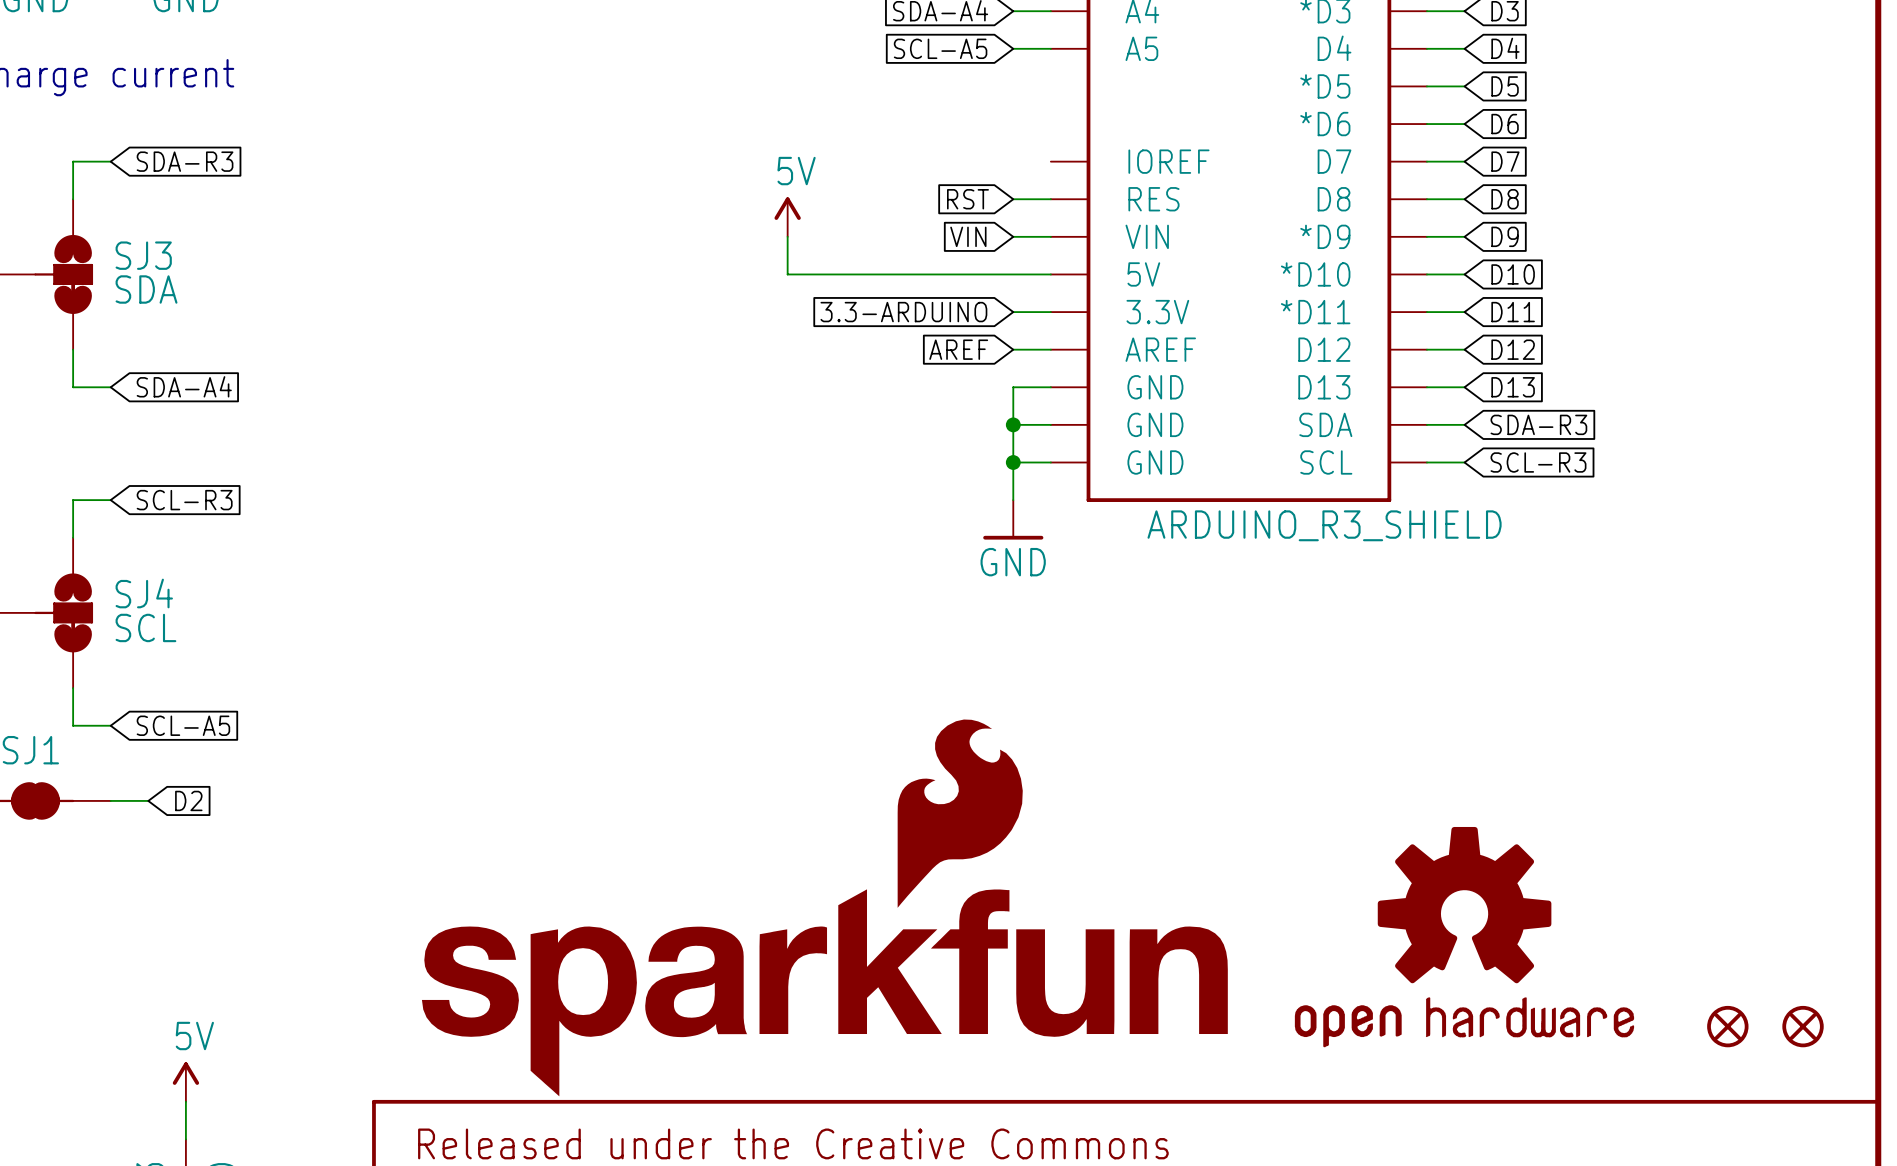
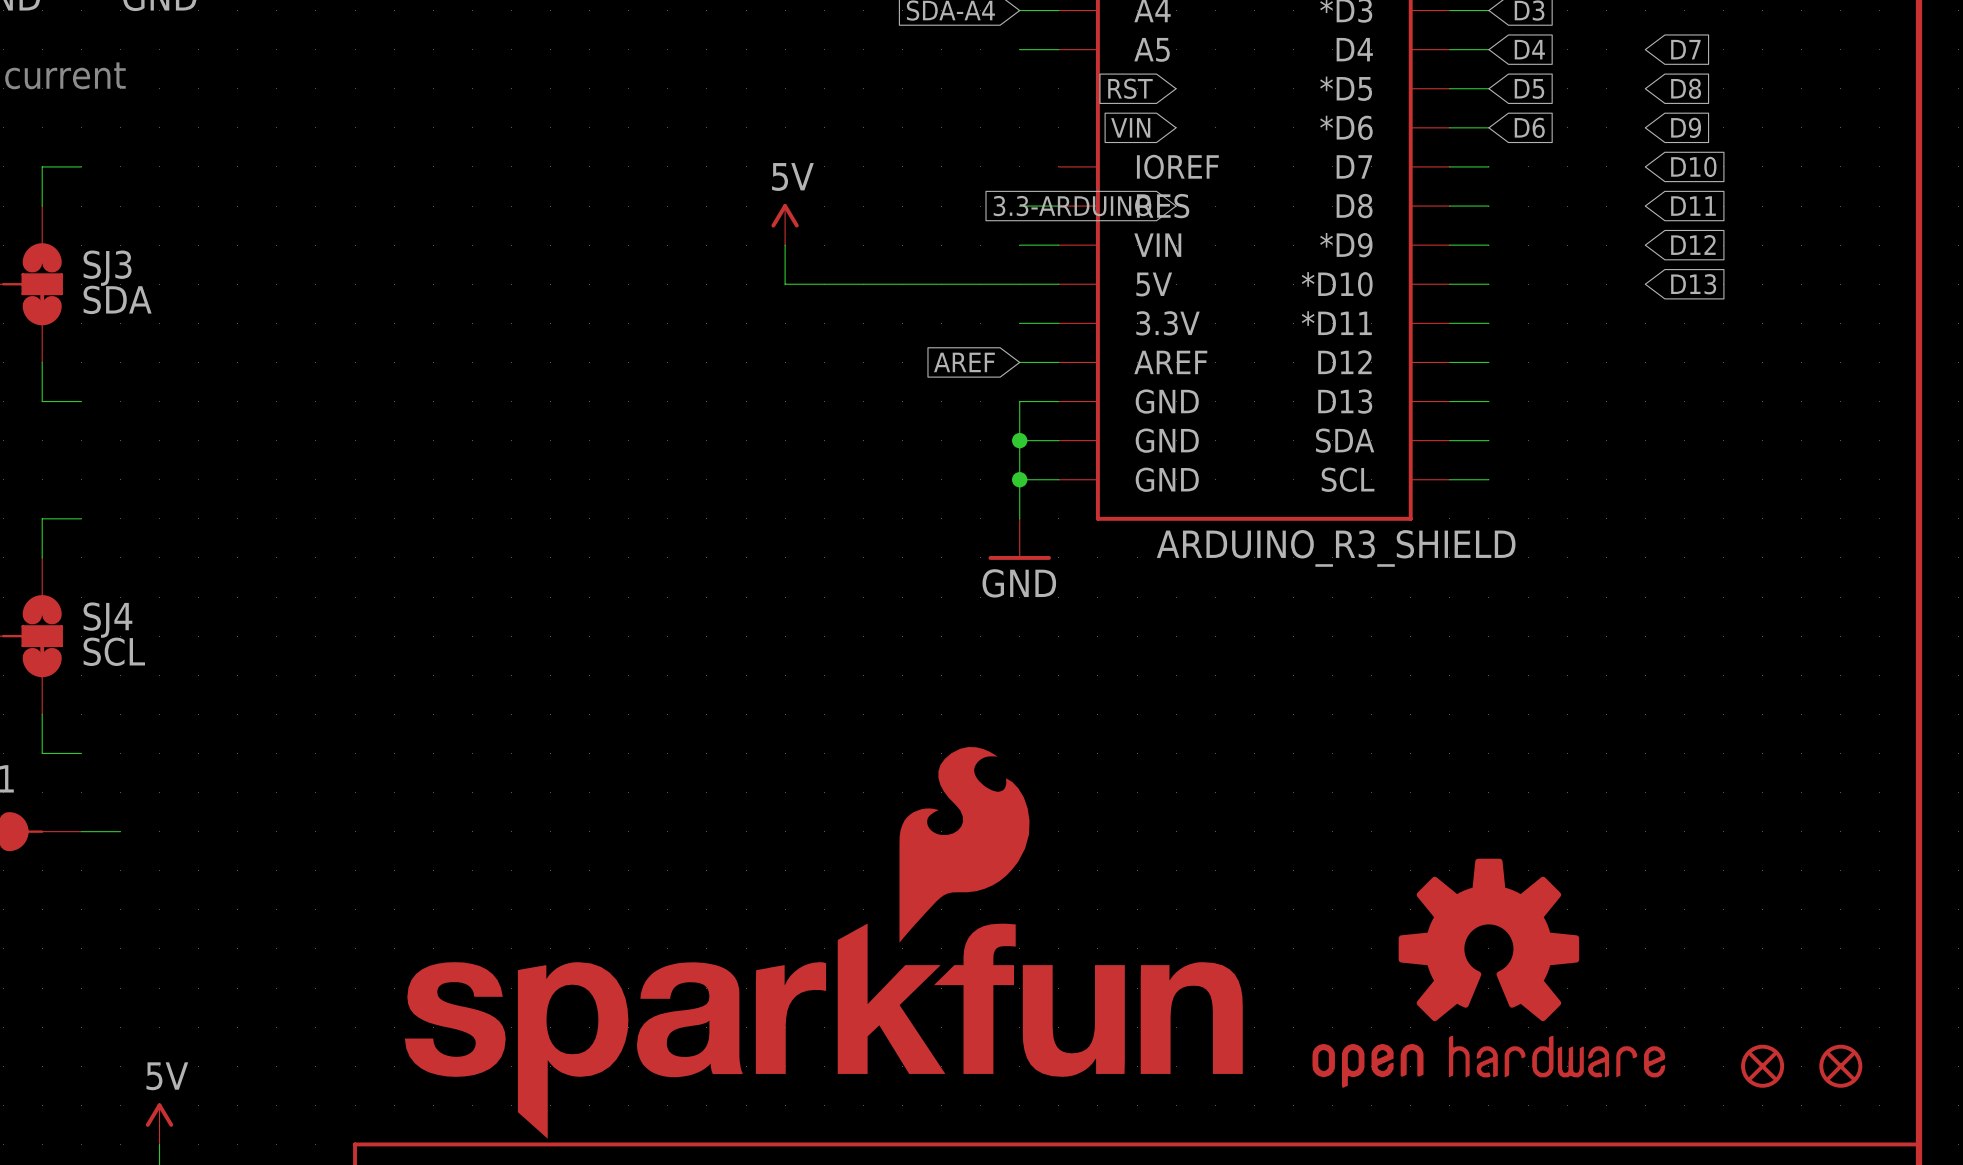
global label: SCL-A5 (940, 48) -> none
global label: SDA-R3 (185, 161) -> none
global label position: D7 (1505, 161) -> D7 (1685, 49)
global label position: RST (967, 199) -> RST (1130, 88)
global label position: D8 (1505, 199) -> D8 (1686, 88)
global label position: VIN (968, 236) -> VIN (1130, 127)
global label position: D9 (1505, 236) -> D9 (1686, 127)
global label position: D10 (1513, 274) -> D10 (1693, 166)
global label position: 3.3-ARDUINO (903, 312) -> 3.3-ARDUINO (1072, 206)
global label position: D11 (1513, 312) -> D11 (1693, 206)
global label position: D12 (1513, 349) -> D12 (1693, 244)
global label: SDA-A4 (184, 386) -> none
global label position: D13 (1513, 387) -> D13 (1693, 284)
global label: SDA-R3 (1538, 424) -> none
global label: SCL-R3 (1538, 462) -> none
global label: SCL-R3 (184, 500) -> none
global label: SCL-A5 (183, 725) -> none
global label: D2 (188, 800) -> none

